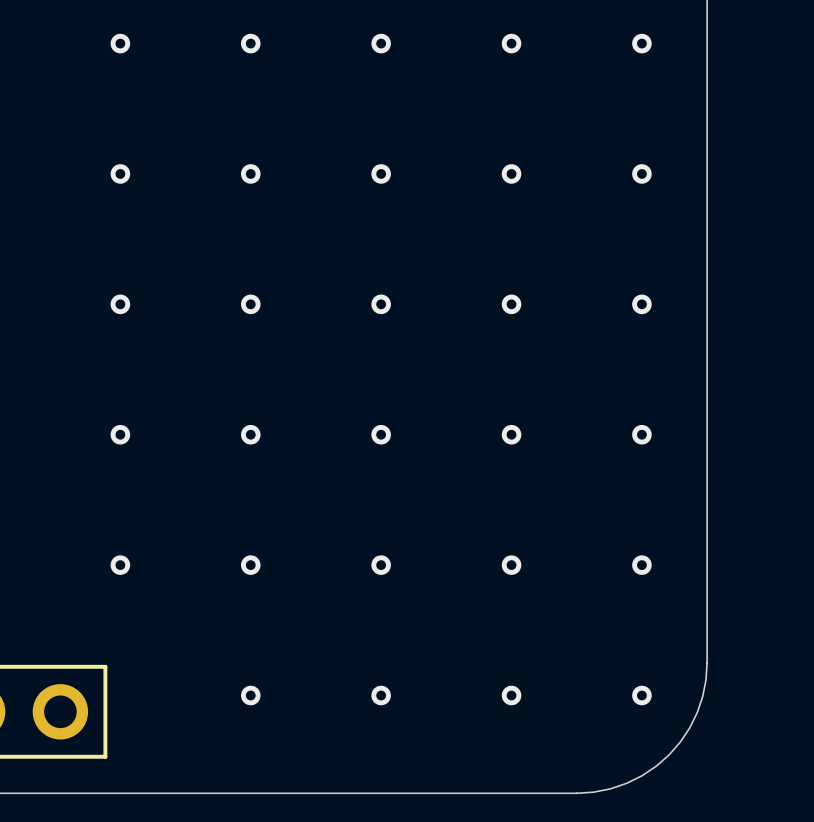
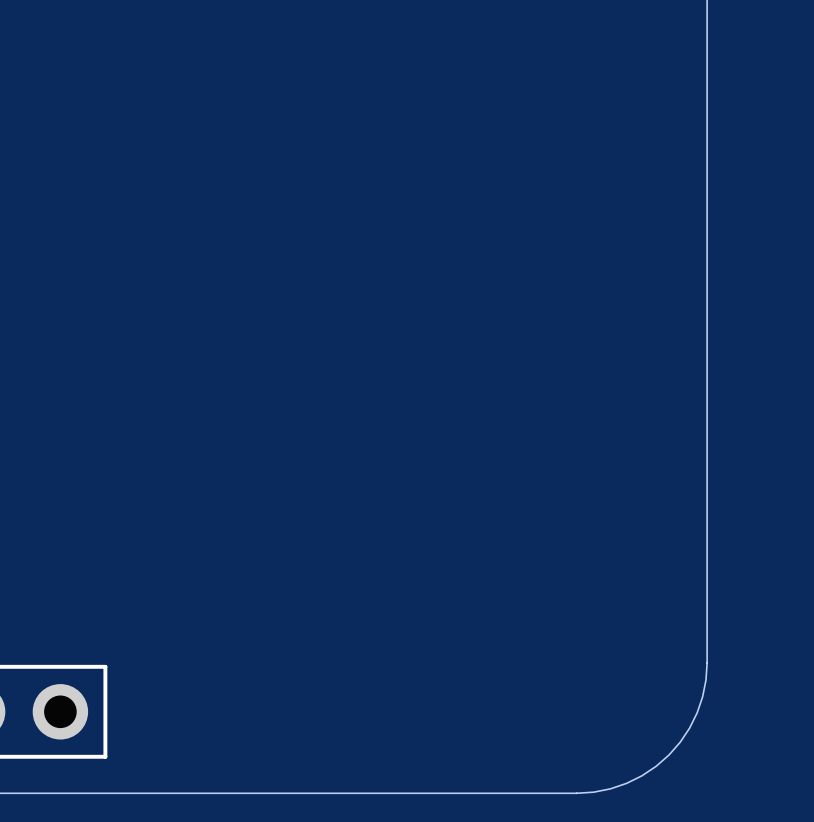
via: (120, 43) -> none
via: (250, 43) -> none
via: (381, 43) -> none
via: (511, 43) -> none
via: (641, 43) -> none
via: (120, 173) -> none
via: (250, 173) -> none
via: (381, 173) -> none
via: (511, 173) -> none
via: (641, 173) -> none
via: (120, 304) -> none
via: (250, 304) -> none
via: (381, 304) -> none
via: (511, 304) -> none
via: (641, 304) -> none
via: (120, 434) -> none
via: (250, 434) -> none
via: (381, 434) -> none
via: (511, 434) -> none
via: (641, 434) -> none
via: (120, 565) -> none
via: (250, 565) -> none
via: (381, 565) -> none
via: (511, 565) -> none
via: (641, 565) -> none
via: (250, 695) -> none
via: (381, 695) -> none
via: (511, 695) -> none
via: (641, 695) -> none

